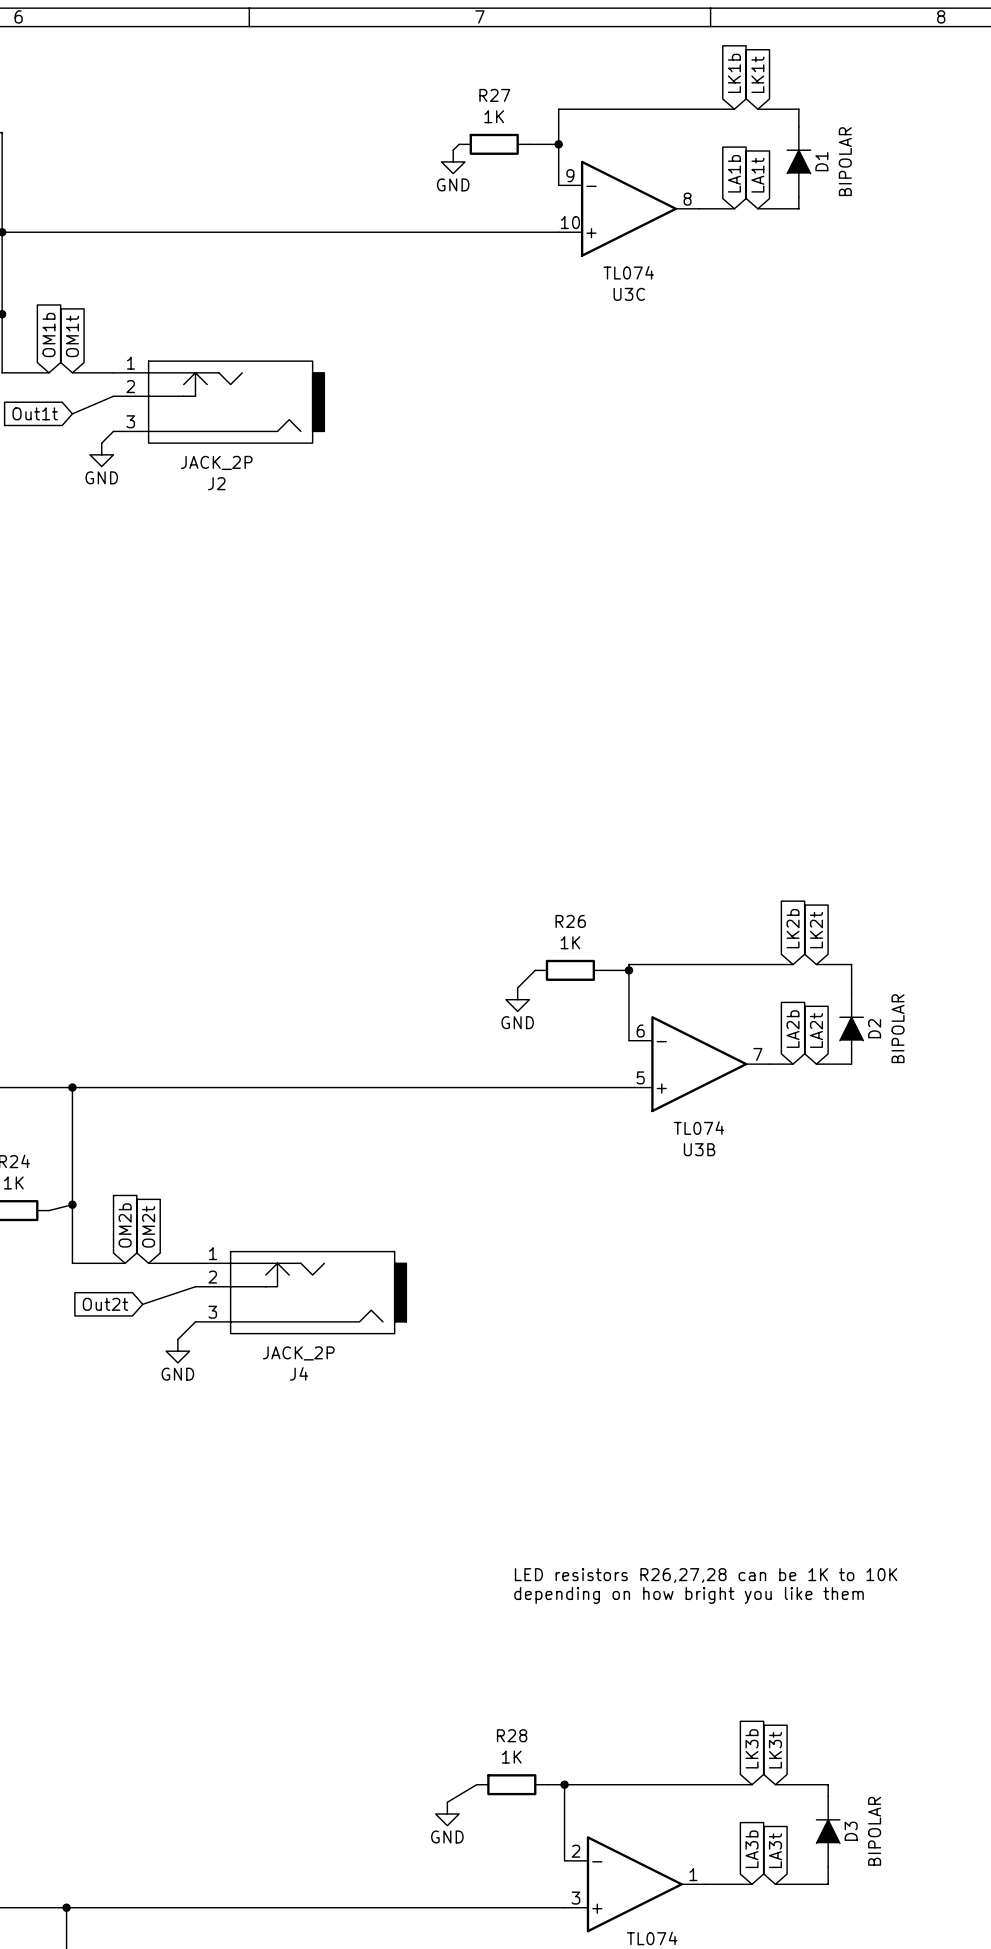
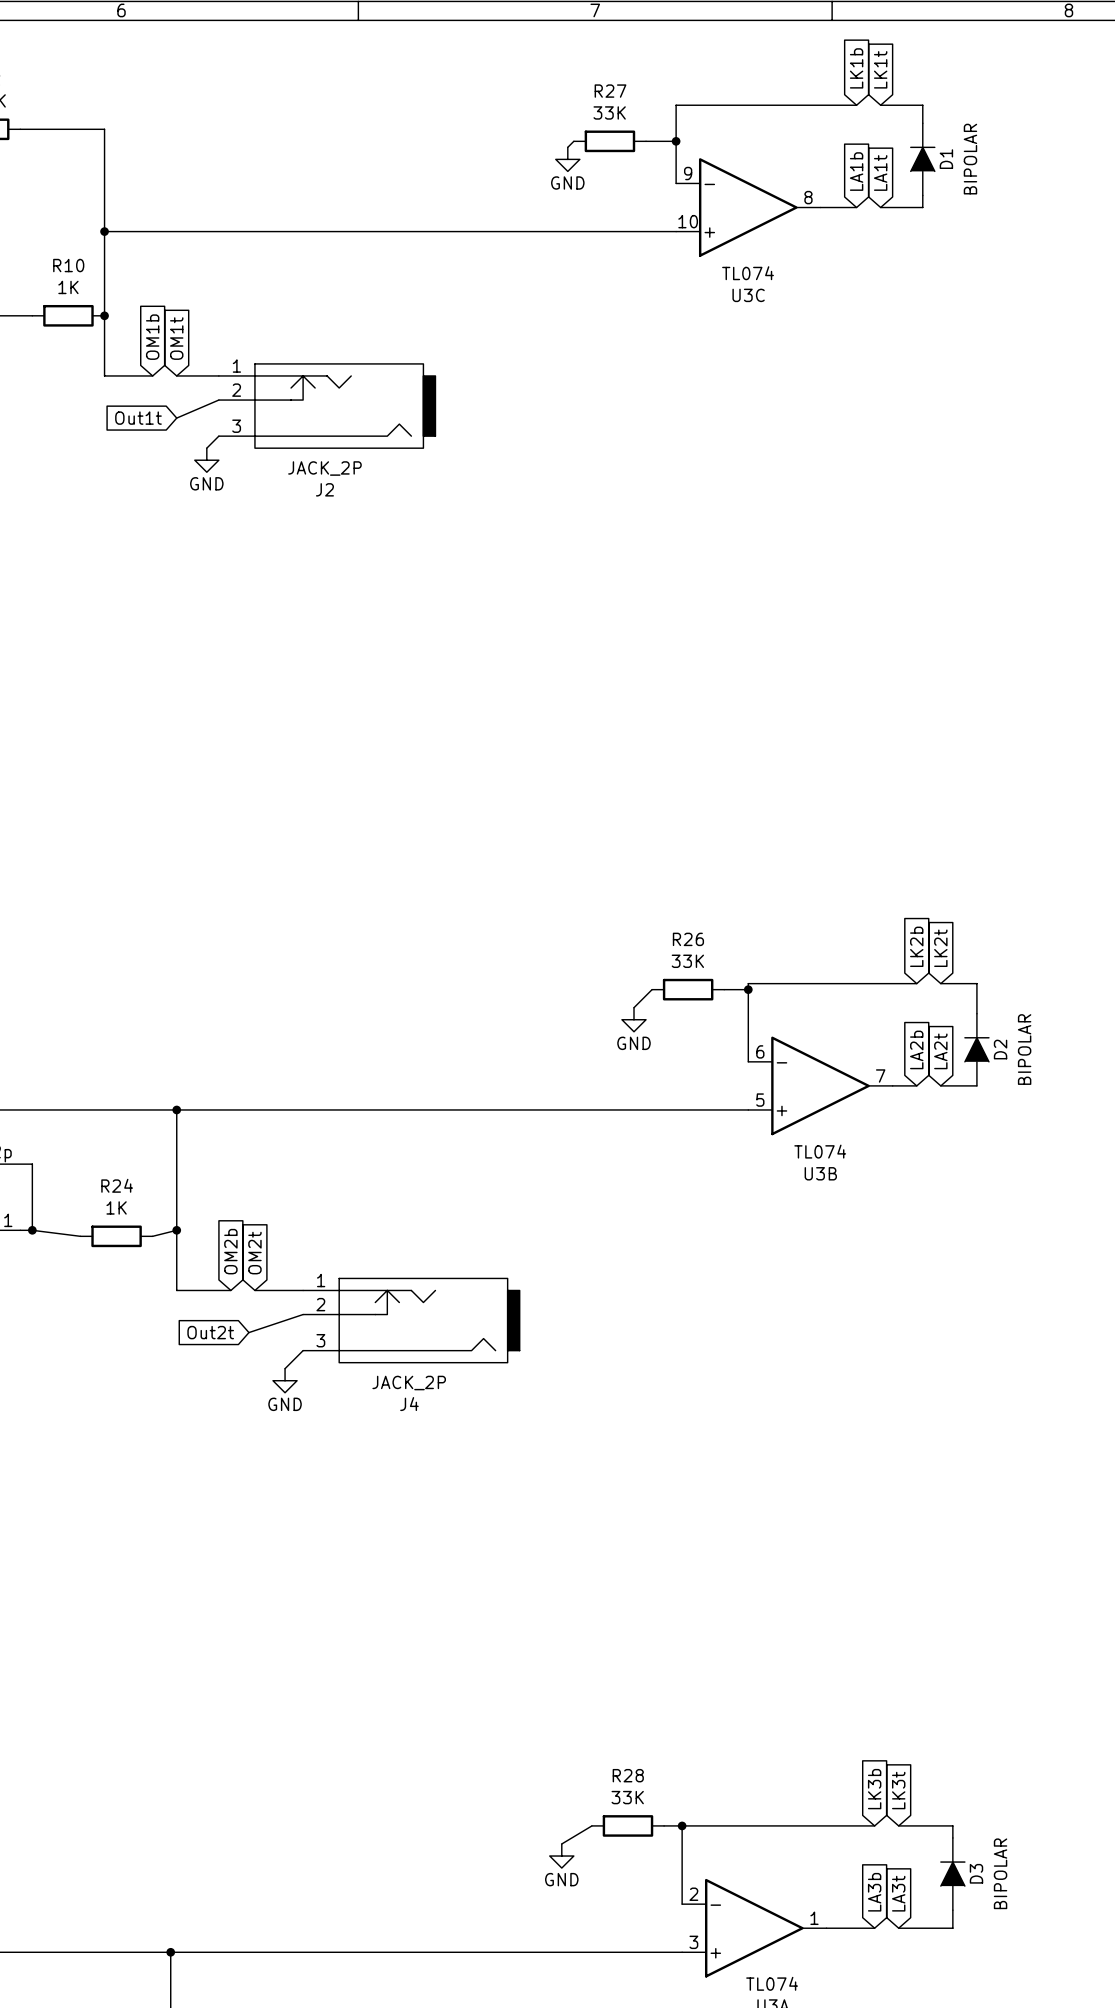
R27 value: 1K (494, 116) -> 33K (609, 112)
R26 value: 1K (570, 942) -> 33K (687, 961)
text: LED resistors R26,27,28 can be 1K to 10K (706, 1575) -> none
text: depending on how bright you like them (689, 1595) -> none
R28 value: 1K (511, 1757) -> 33K (627, 1797)

